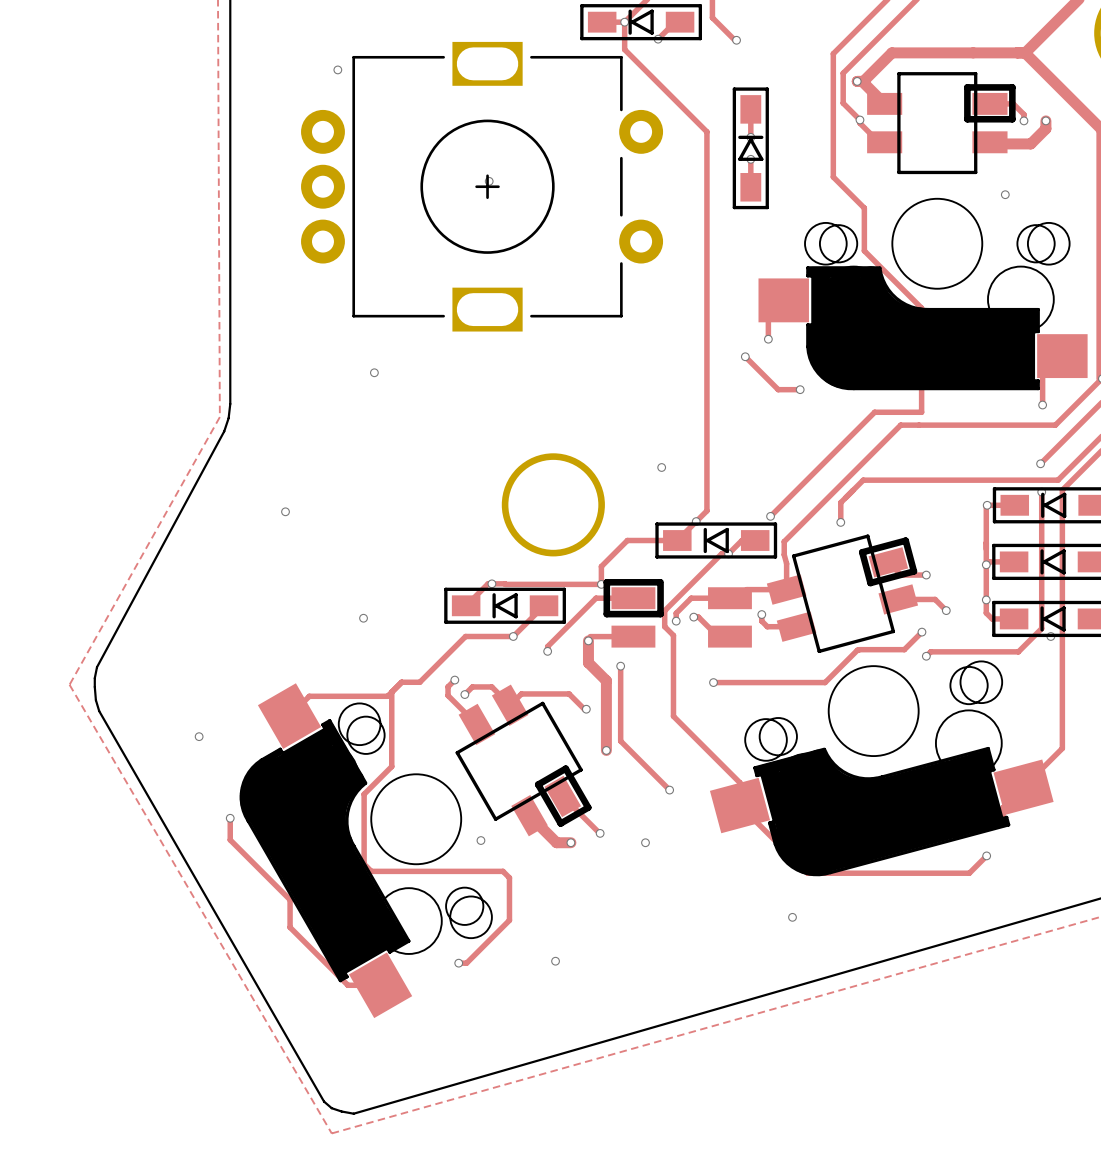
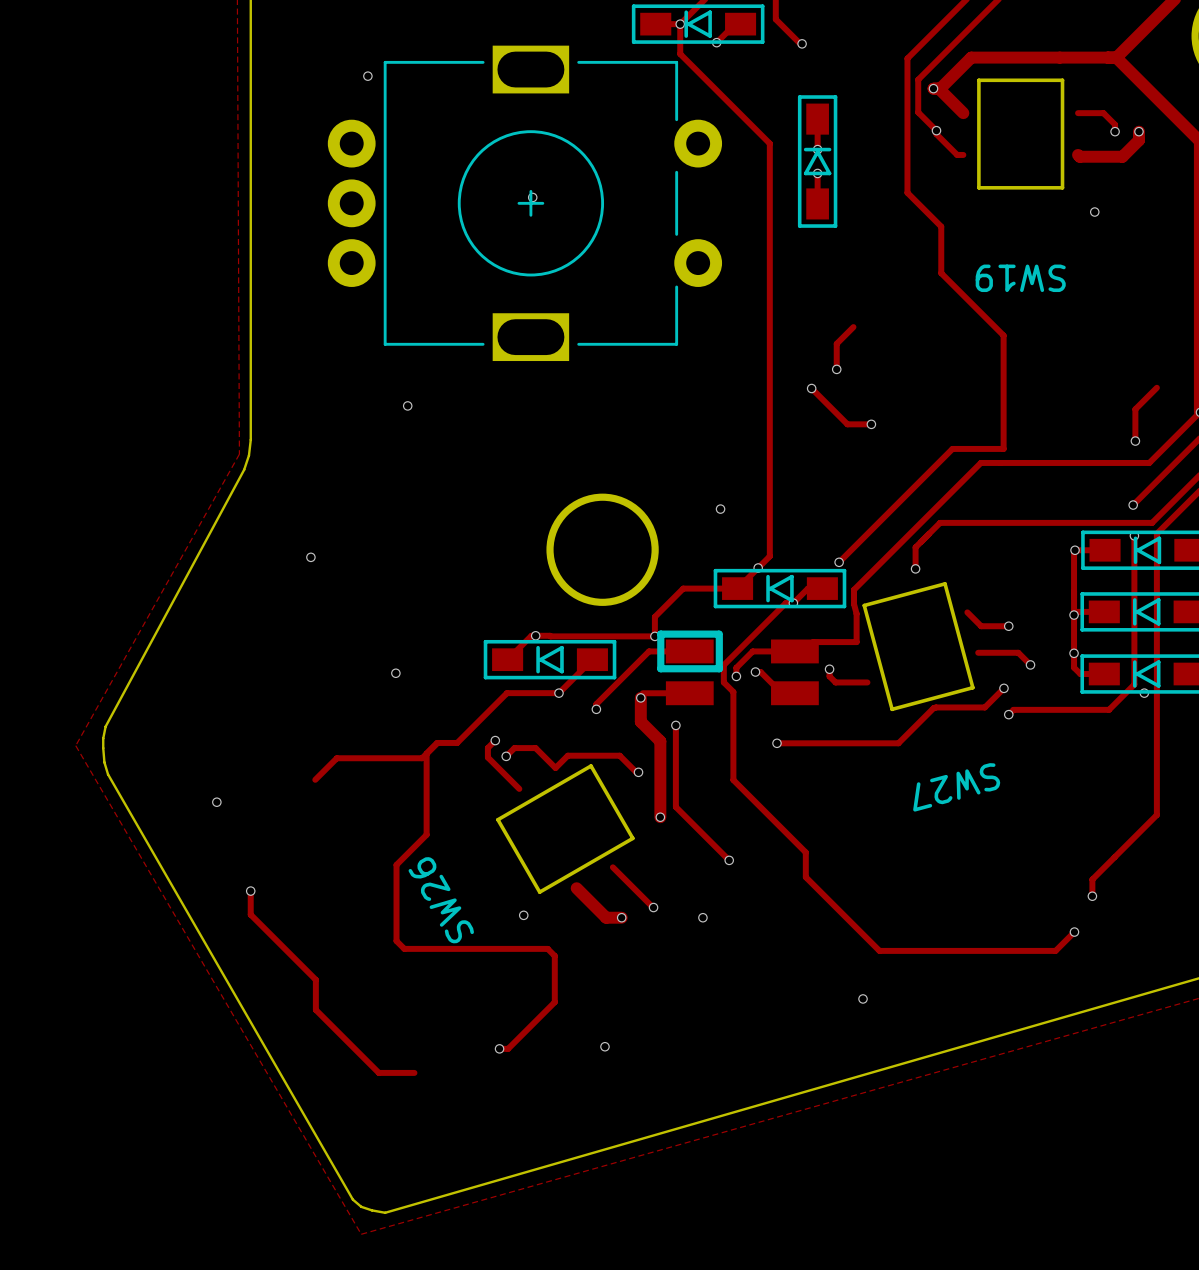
part: (923, 237) -> none
SW19: none -> (1020, 278)
part: (881, 706) -> none
SW27: none -> (956, 787)
SW26: none -> (441, 900)
part: (415, 850) -> none

